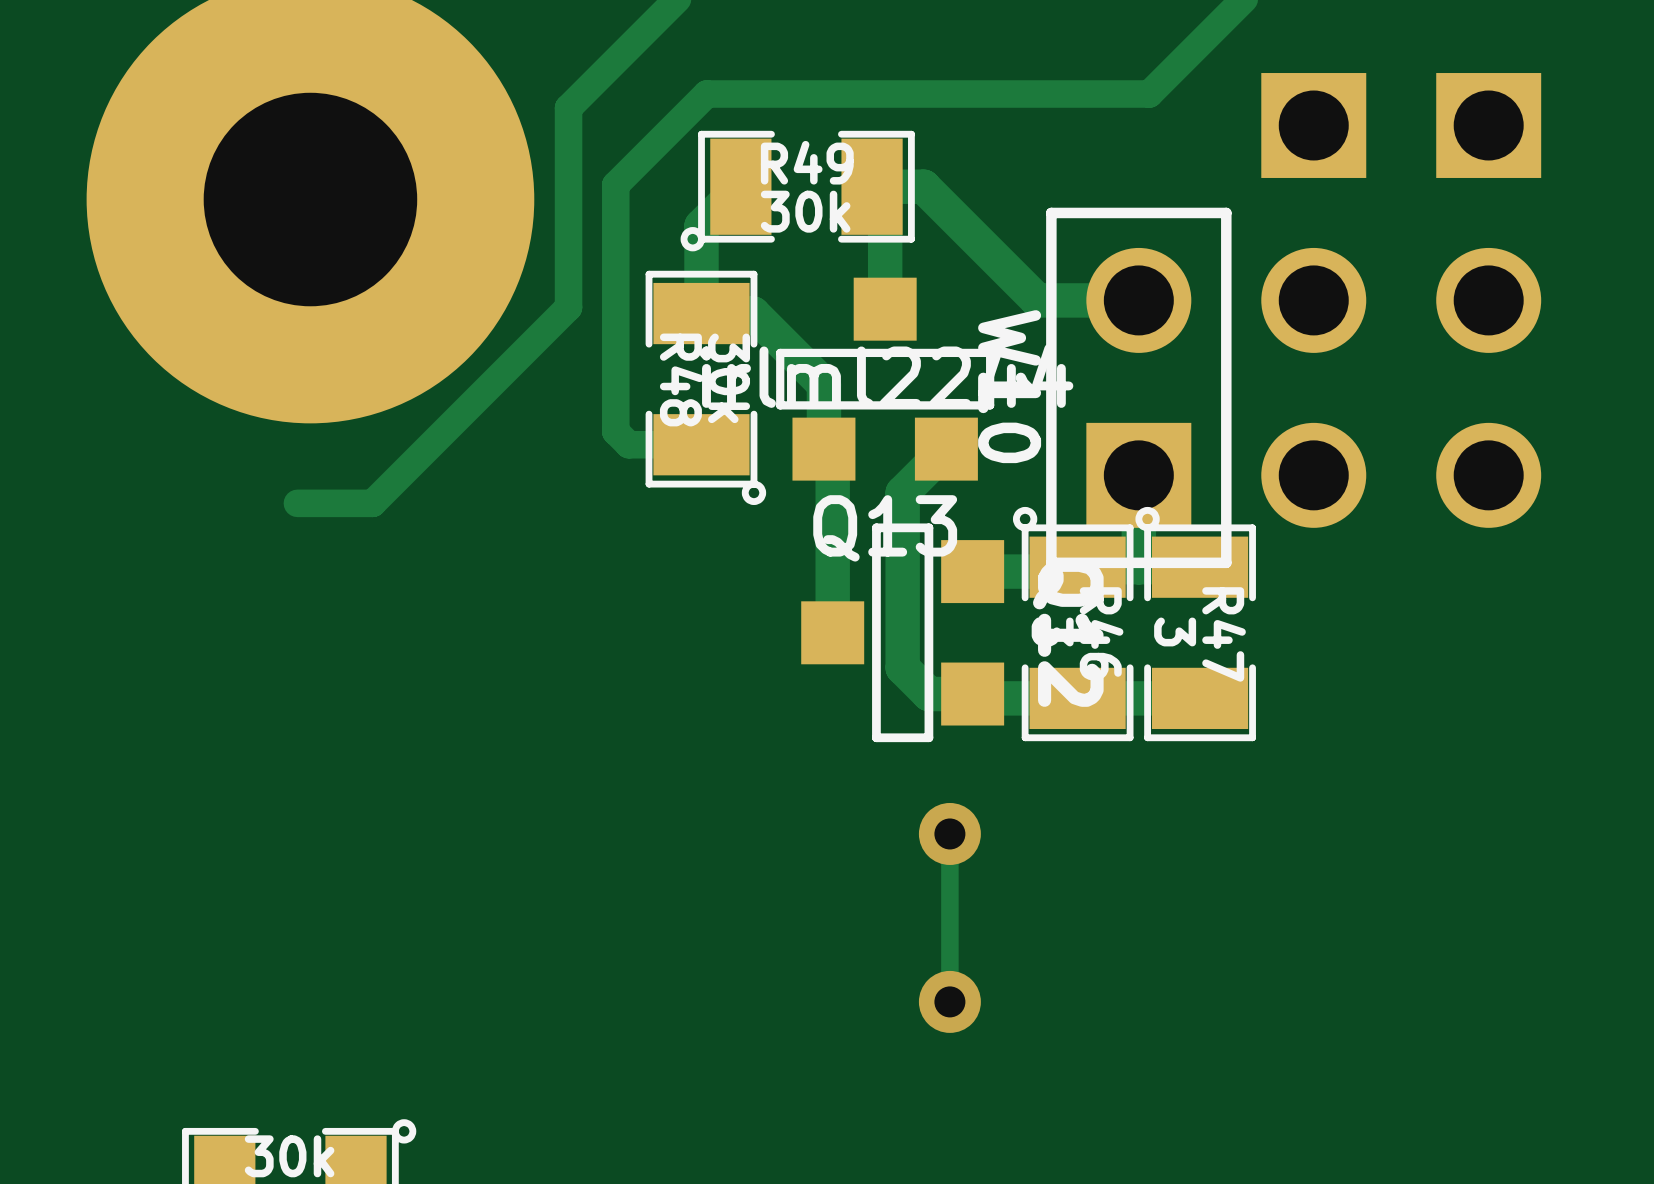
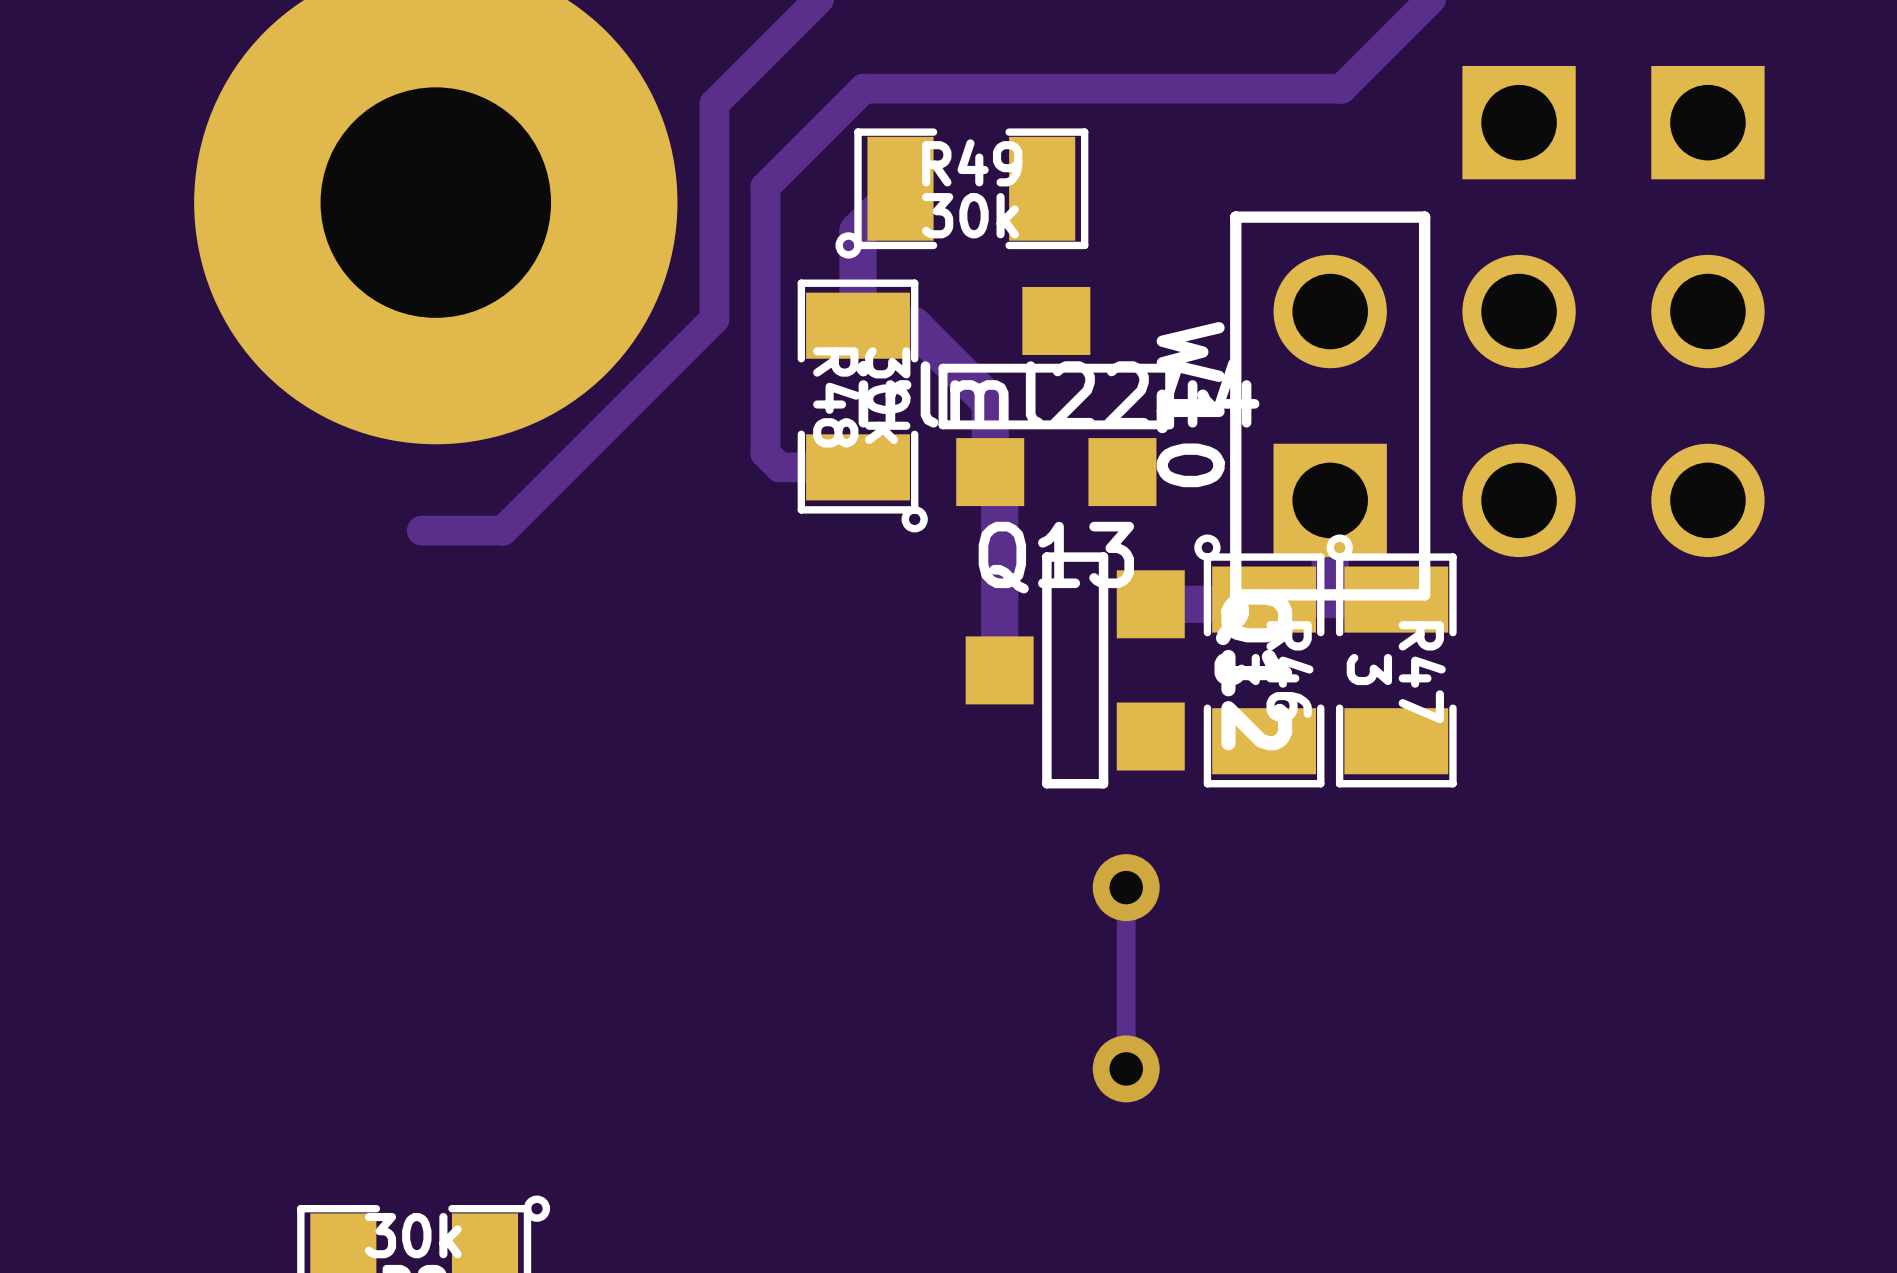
track: (1138, 300) (1037, 300) (923, 186) (872, 186) (885, 199) (885, 309) -> none
track: (946, 449) (902, 492) (902, 667) (928, 694) (972, 694) (977, 698) (1200, 698) -> none

